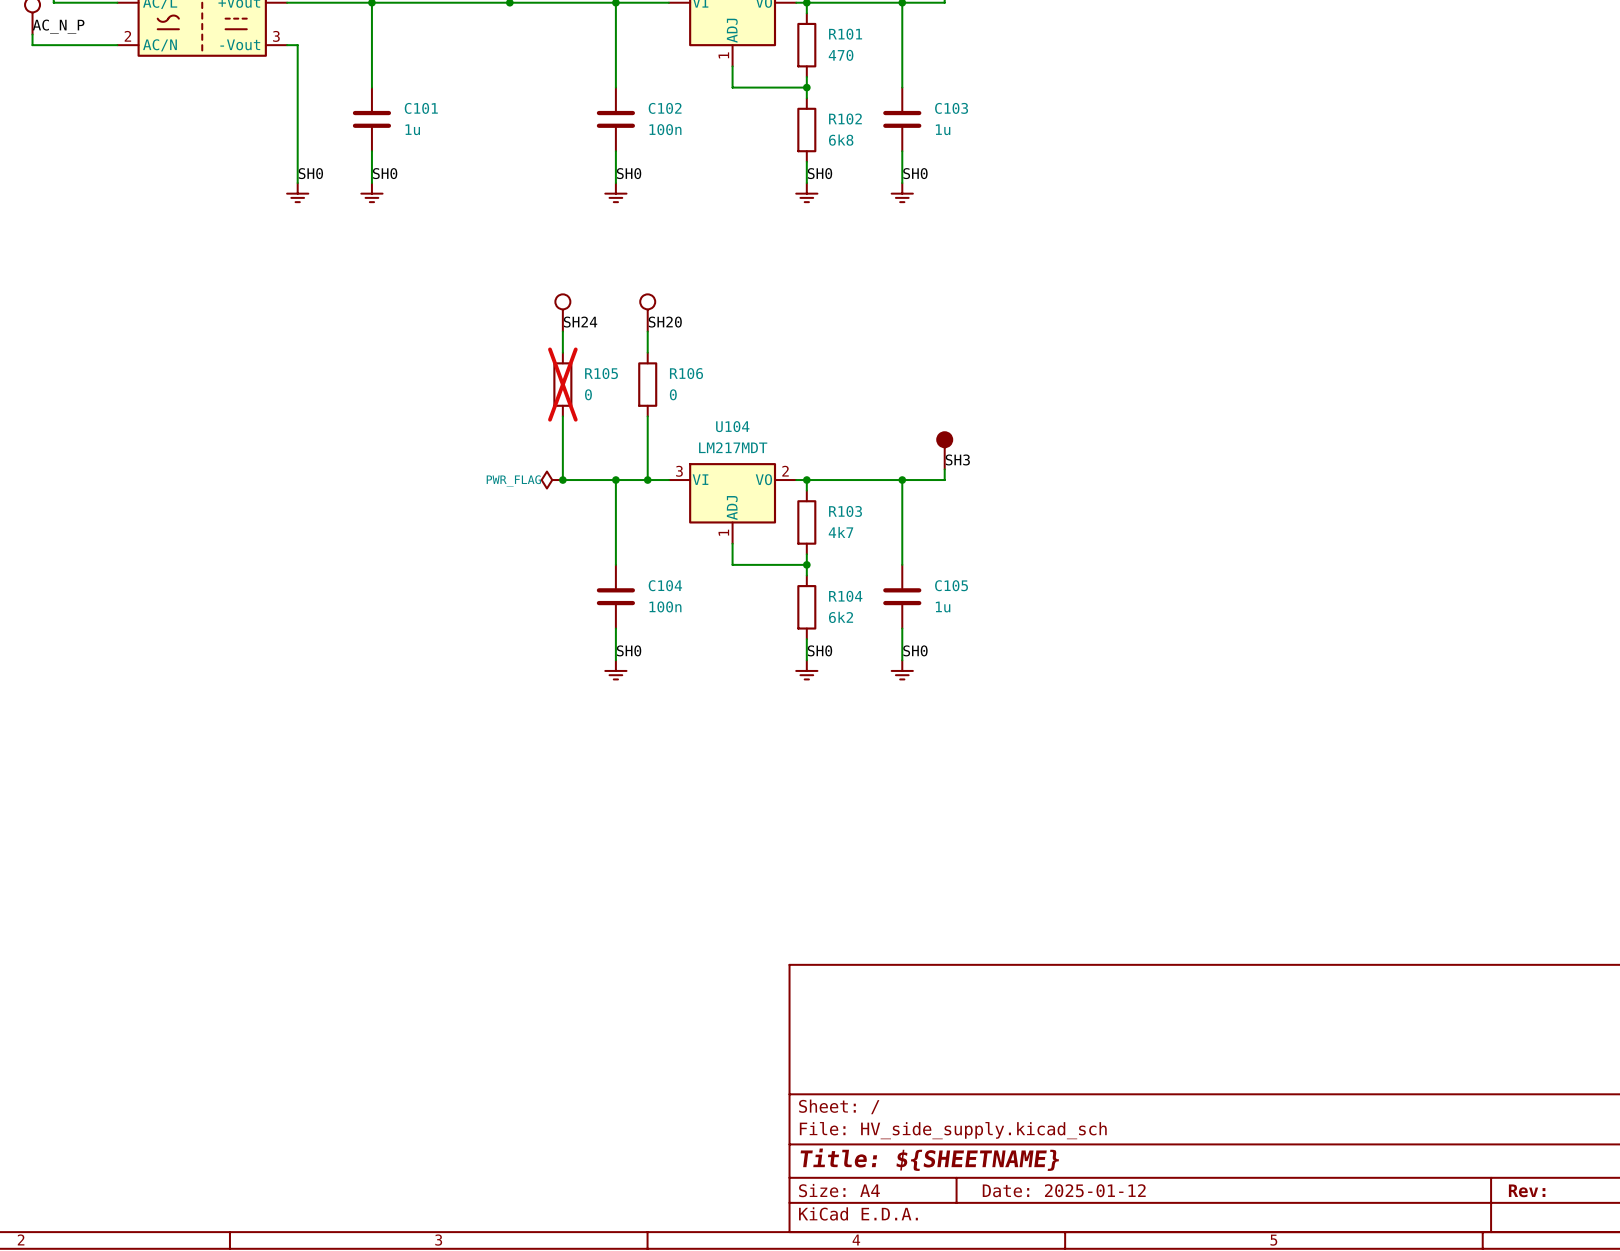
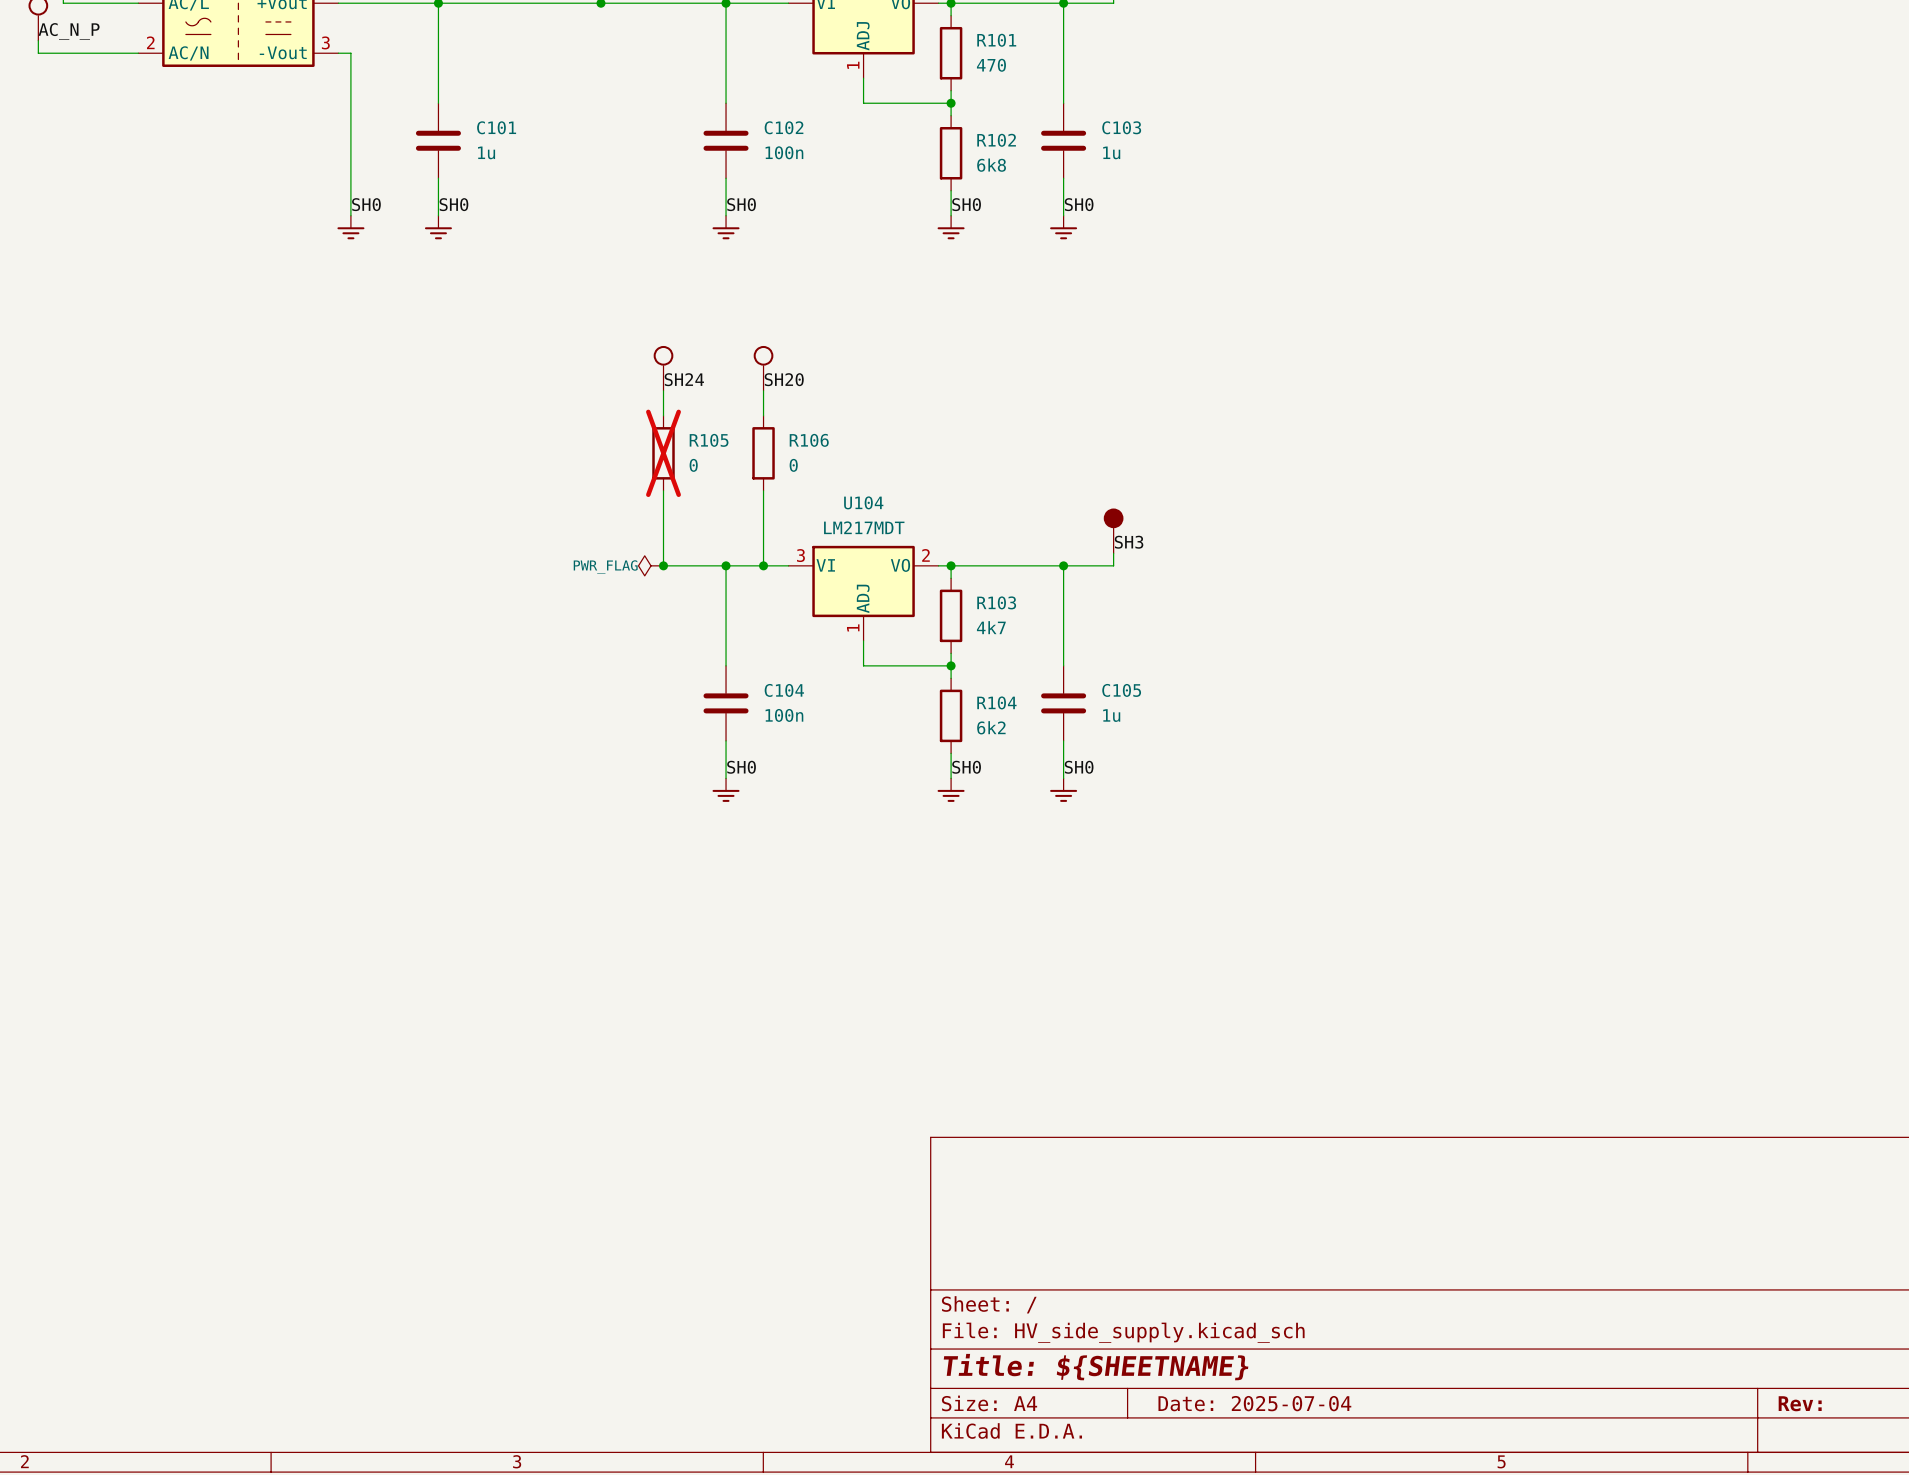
title block: Date: 2025-01-12 (1064, 1190) -> Date: 2025-07-04 (1254, 1403)

